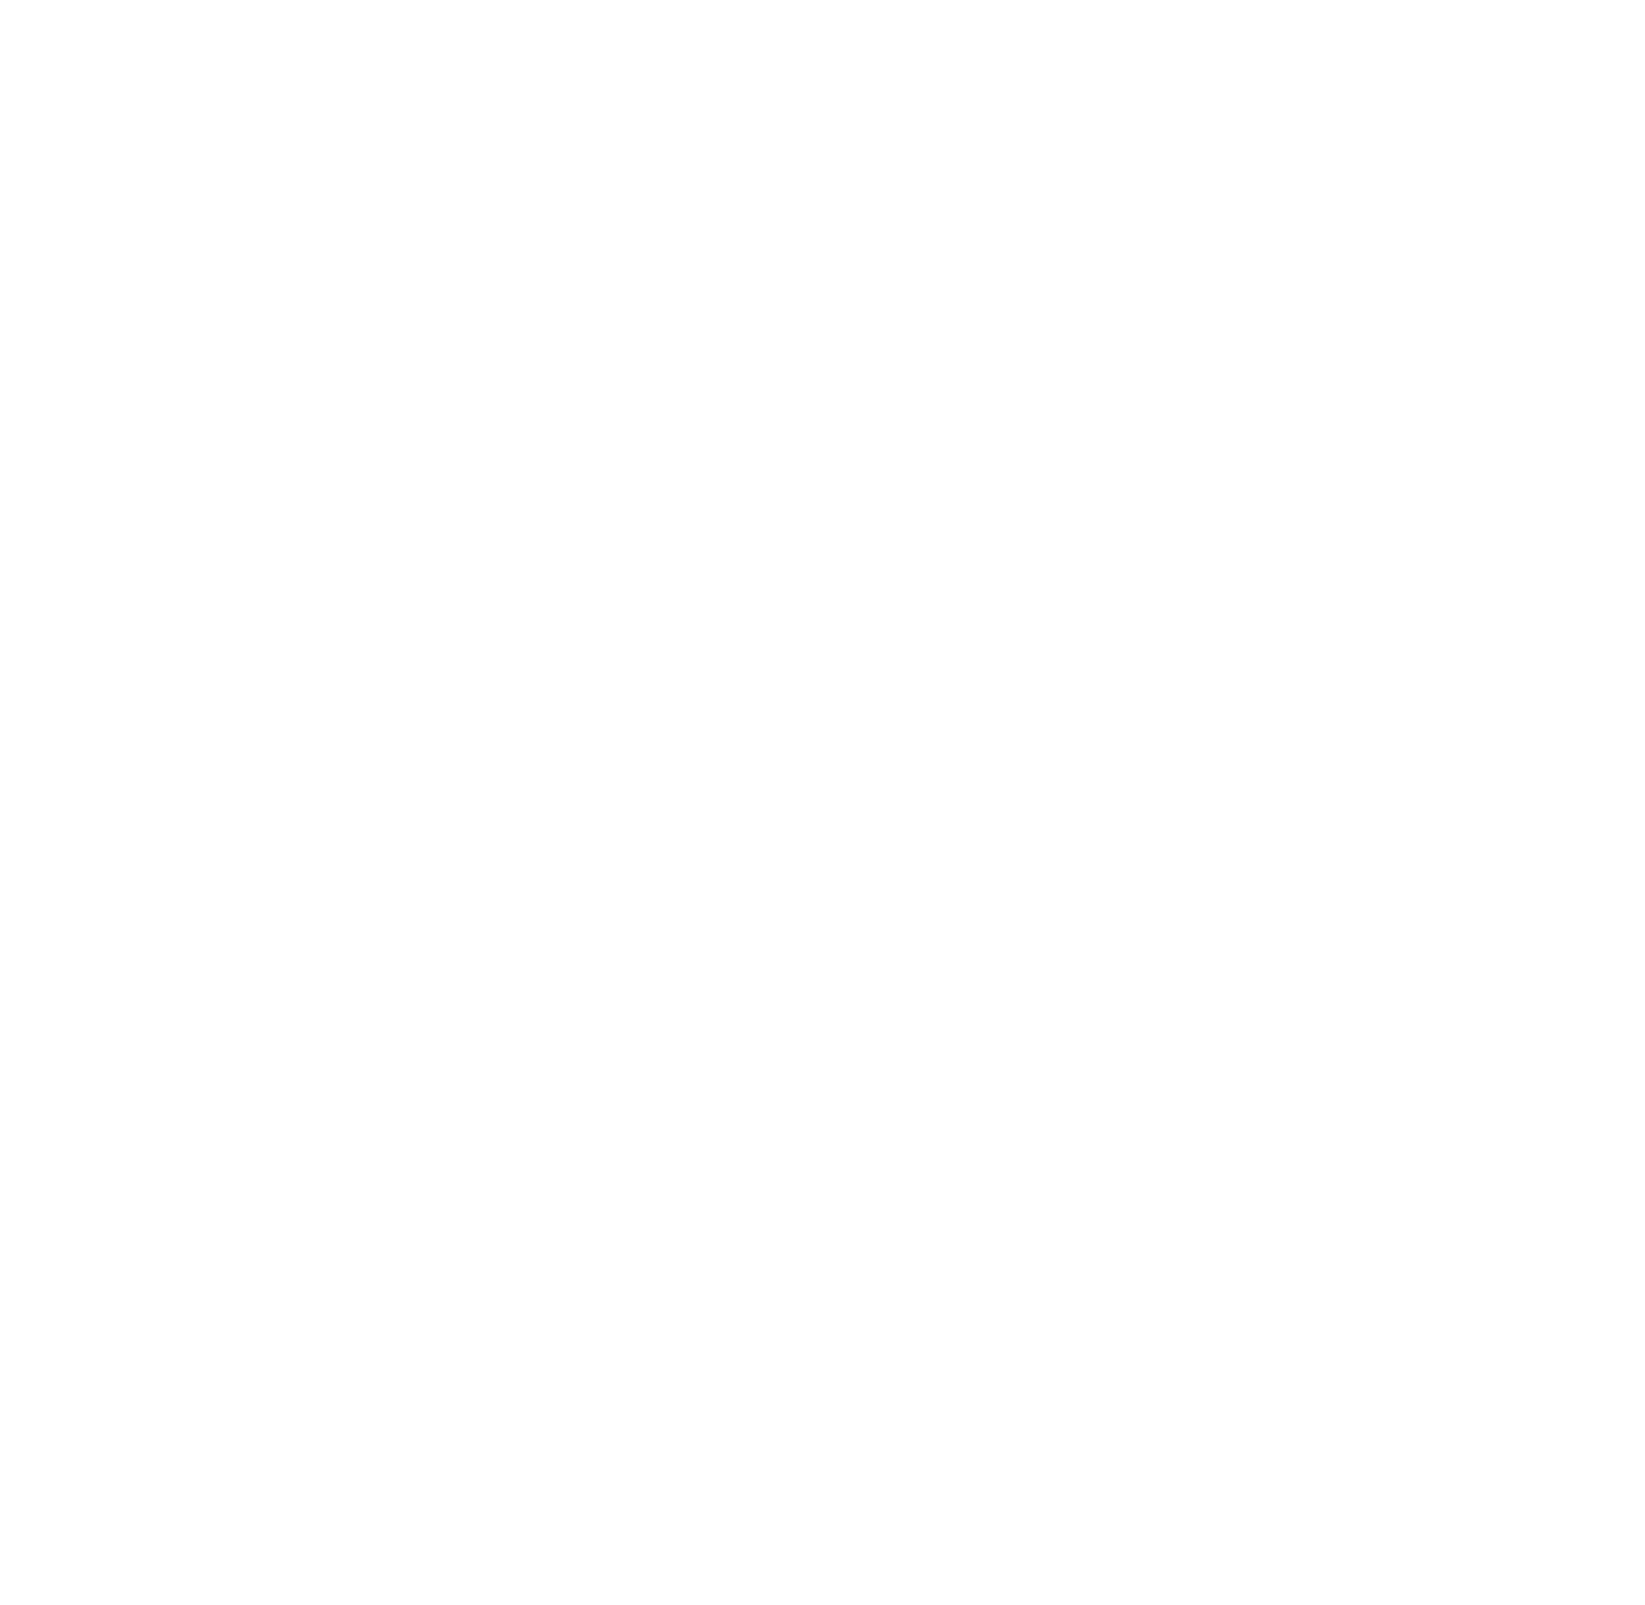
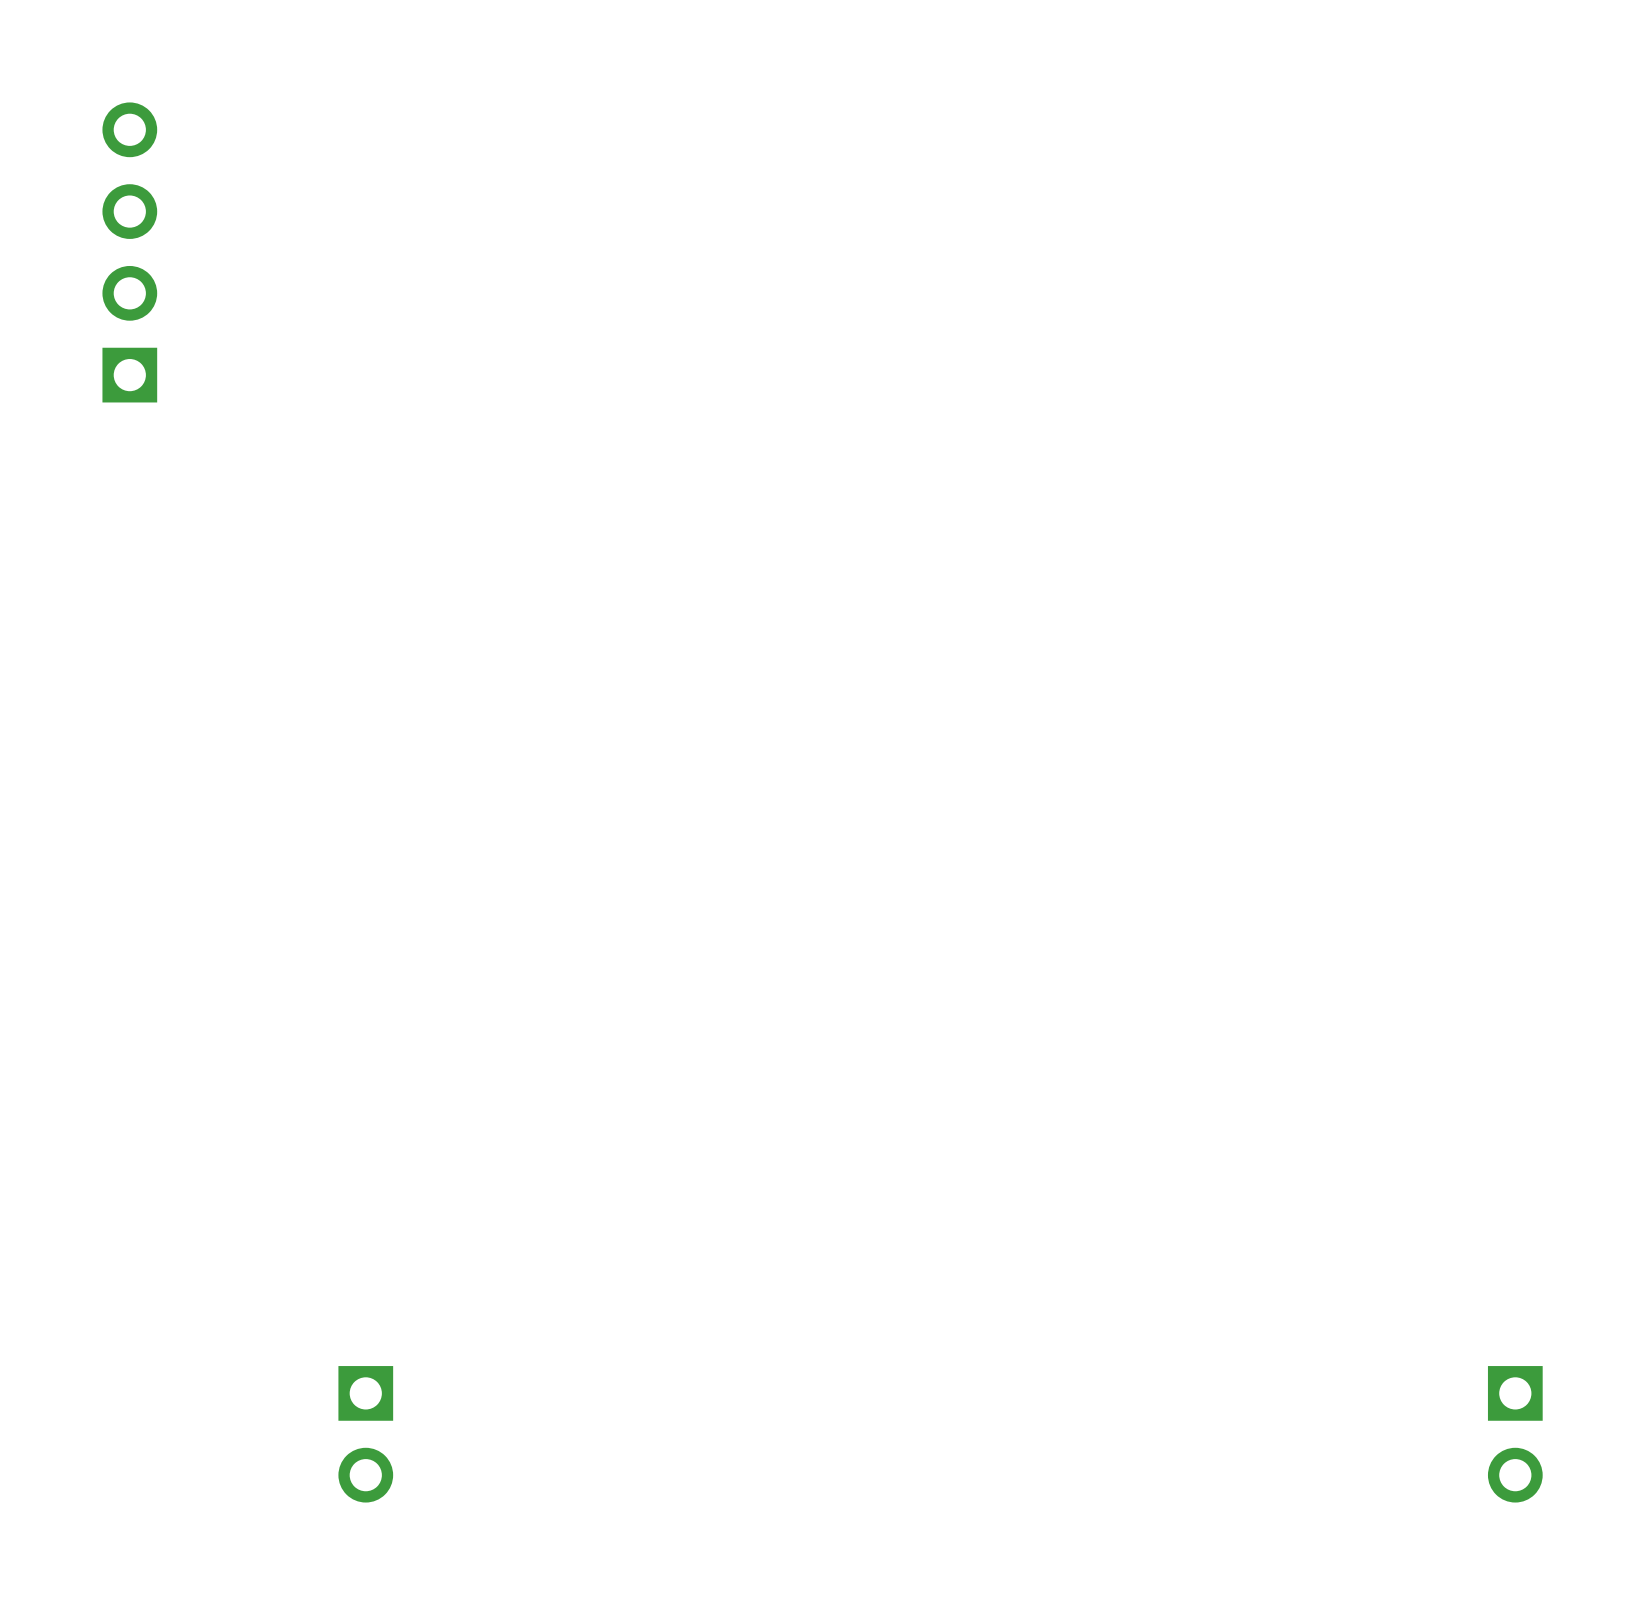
part: none -> (129, 252)
part: none -> (365, 1434)
part: none -> (1515, 1434)

